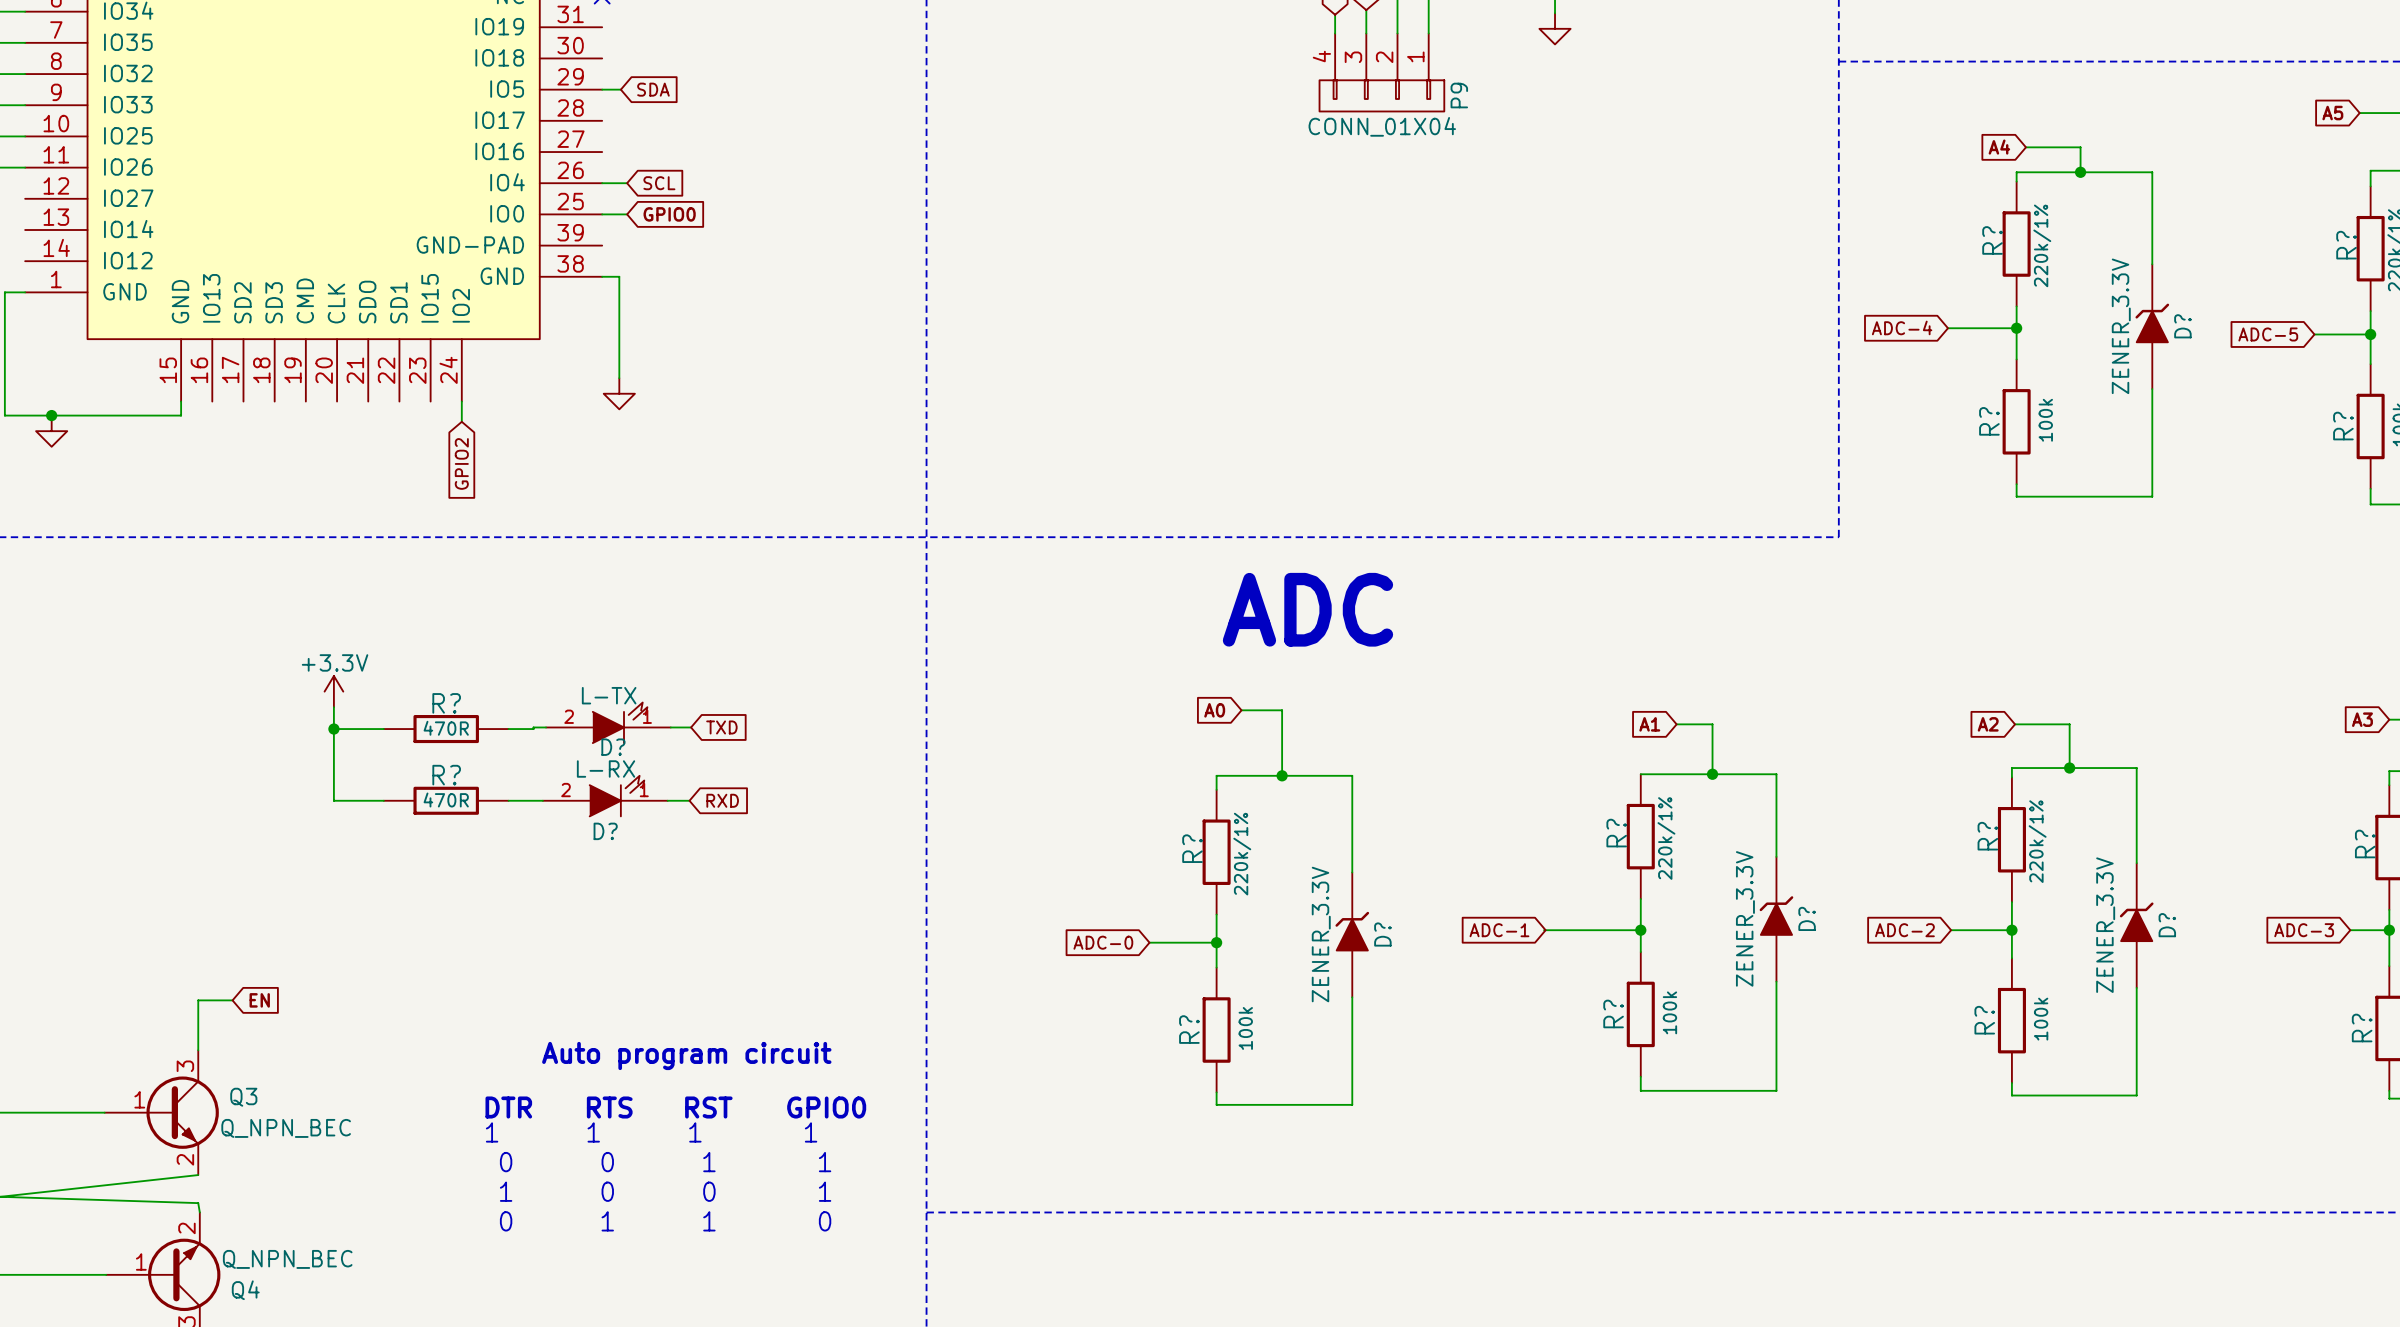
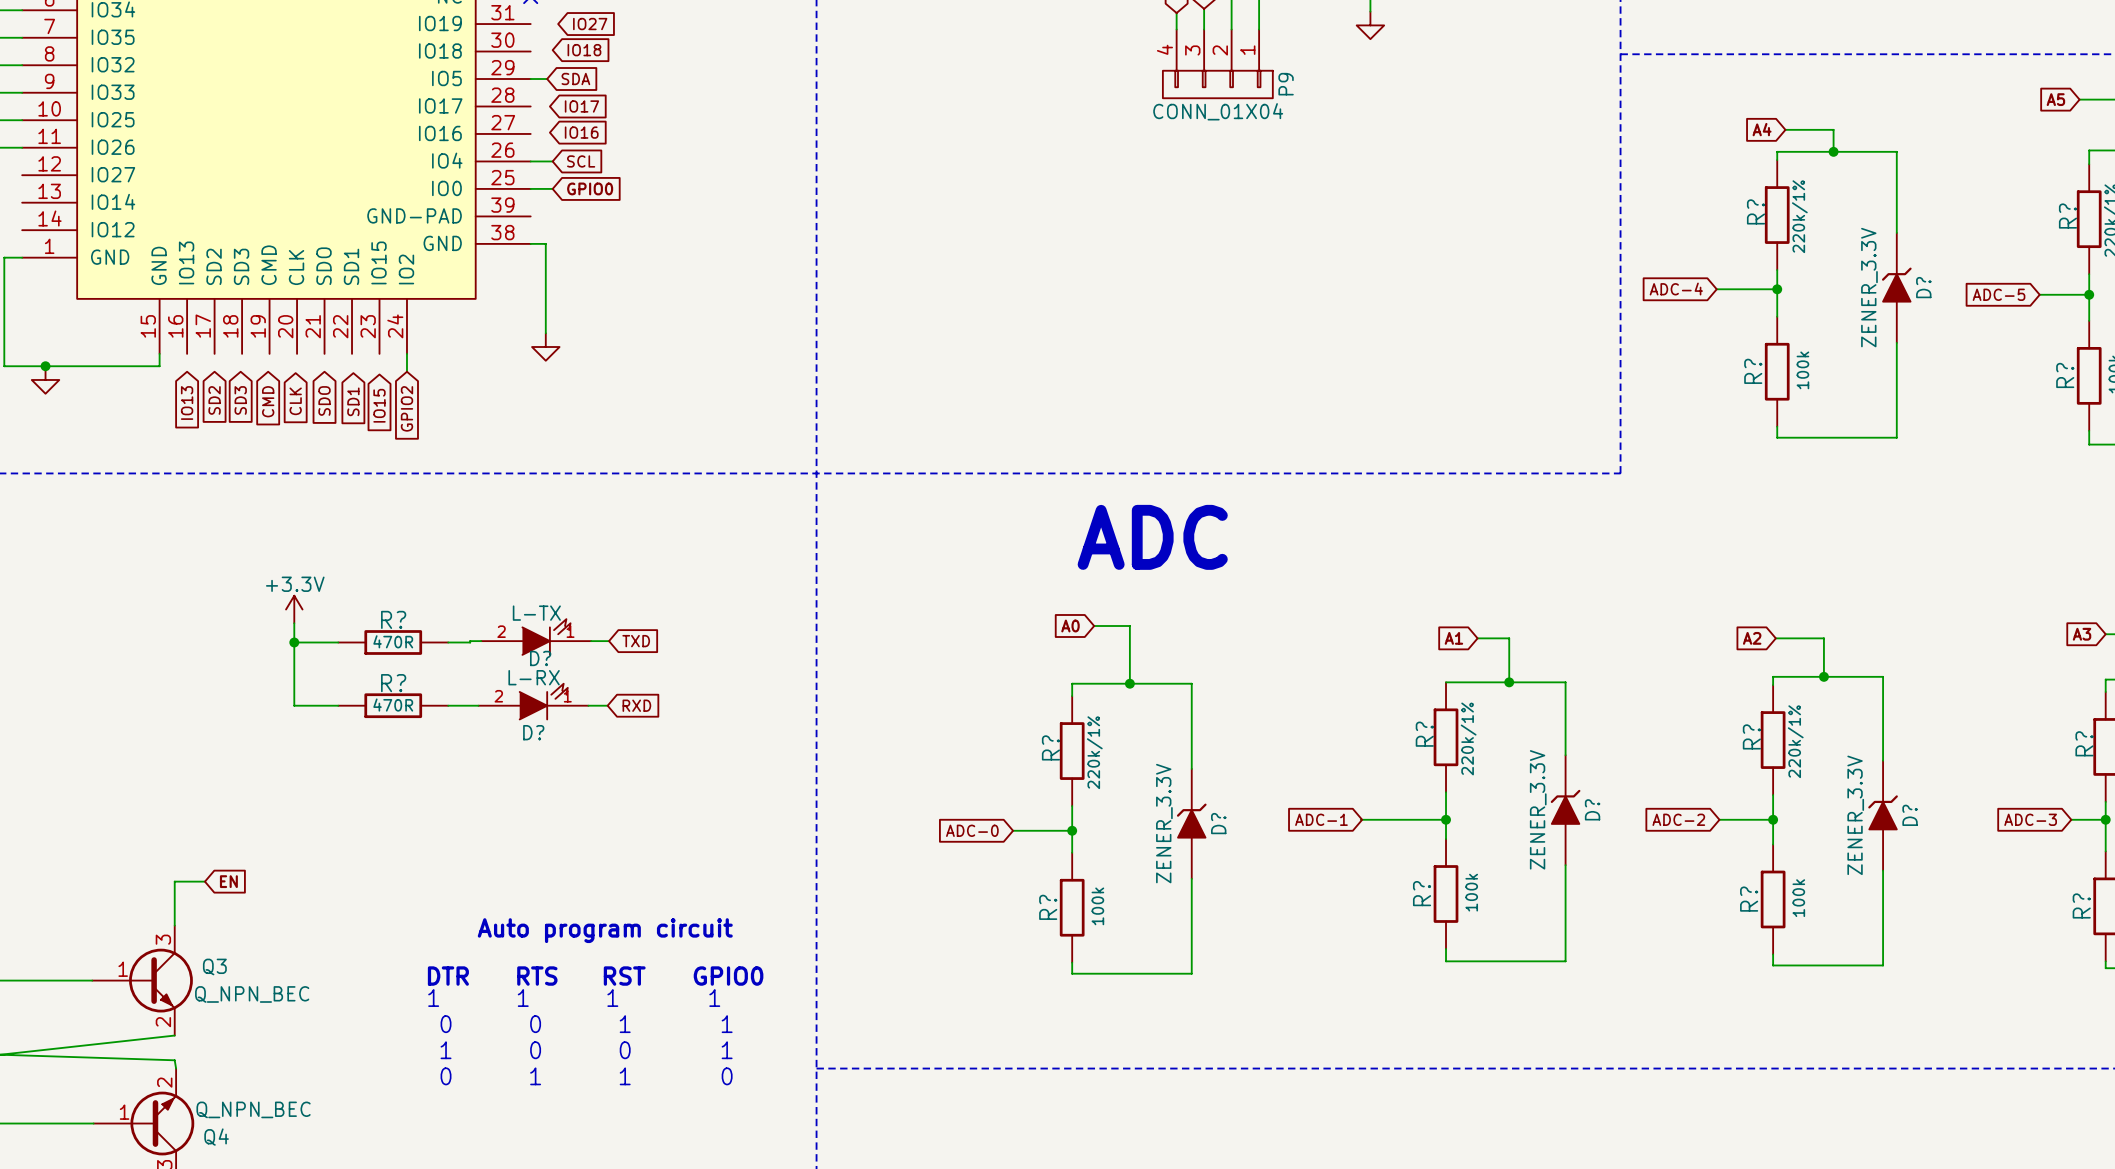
global label: none -> IO27 (590, 24)
global label: none -> IO18 (584, 50)
global label: none -> IO17 (581, 106)
global label: none -> IO16 (581, 132)
global label: none -> SD2 (214, 400)
global label: none -> SD3 (240, 400)
global label: none -> SDO (324, 400)
global label: none -> CMD (268, 401)
global label: none -> CLK (295, 401)
global label: none -> SD1 (353, 401)
global label: none -> IO13 (187, 403)
global label: none -> IO15 (379, 405)

